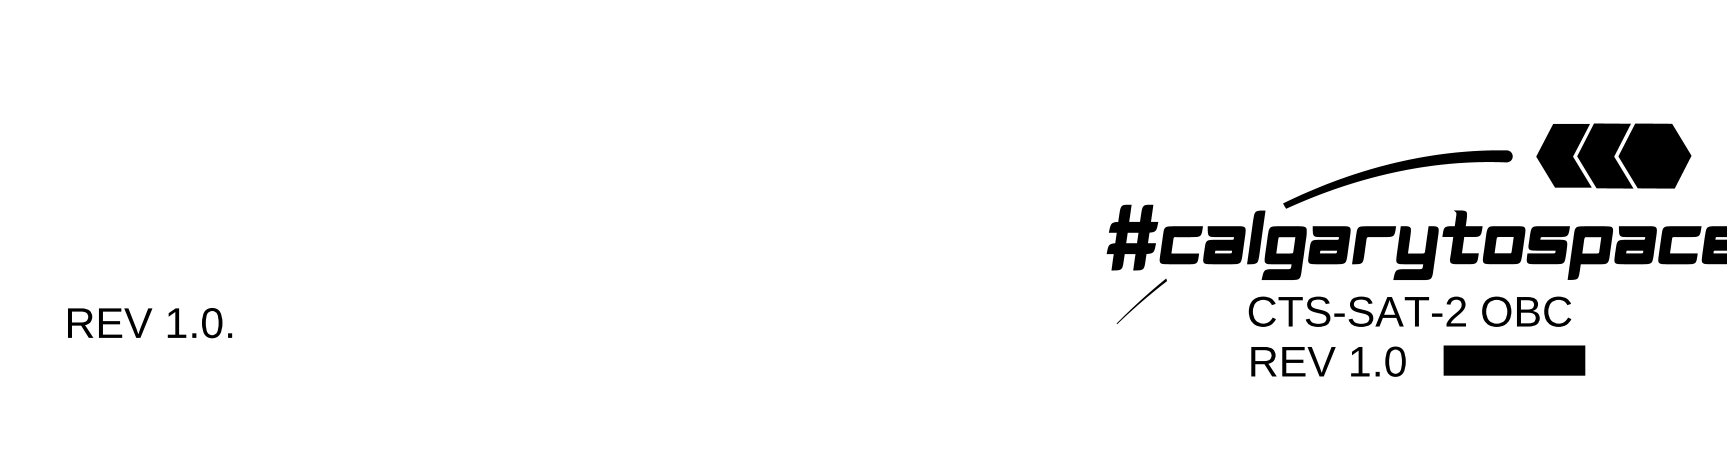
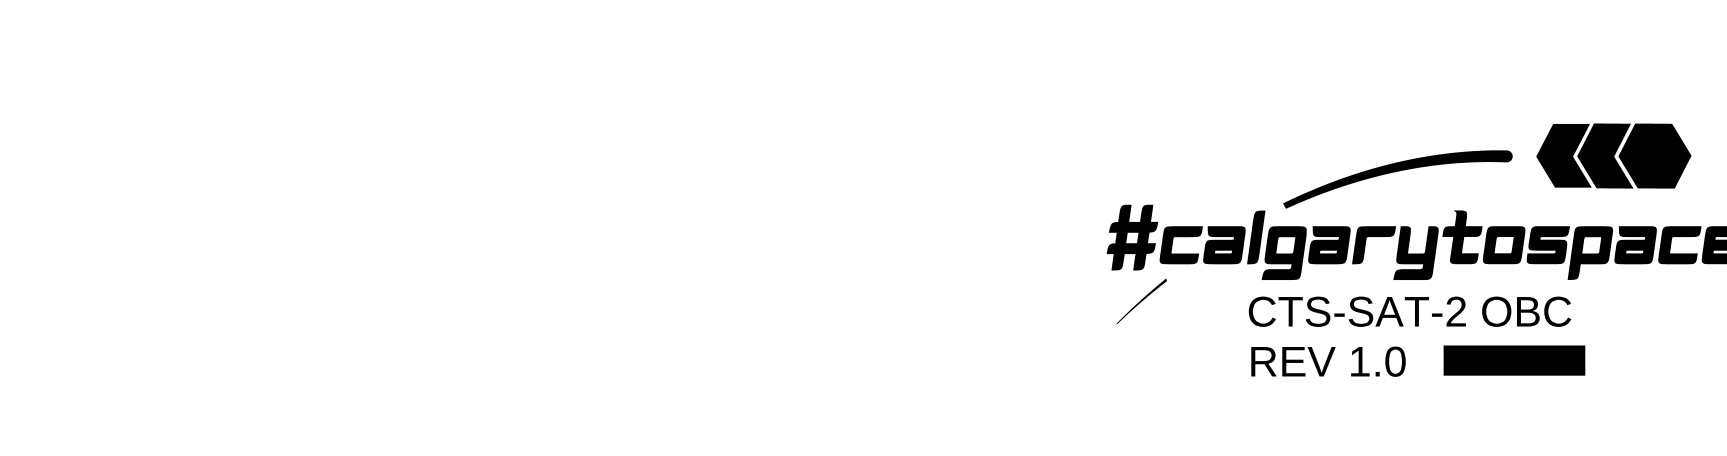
text: REV 1.0. (150, 323) -> none

